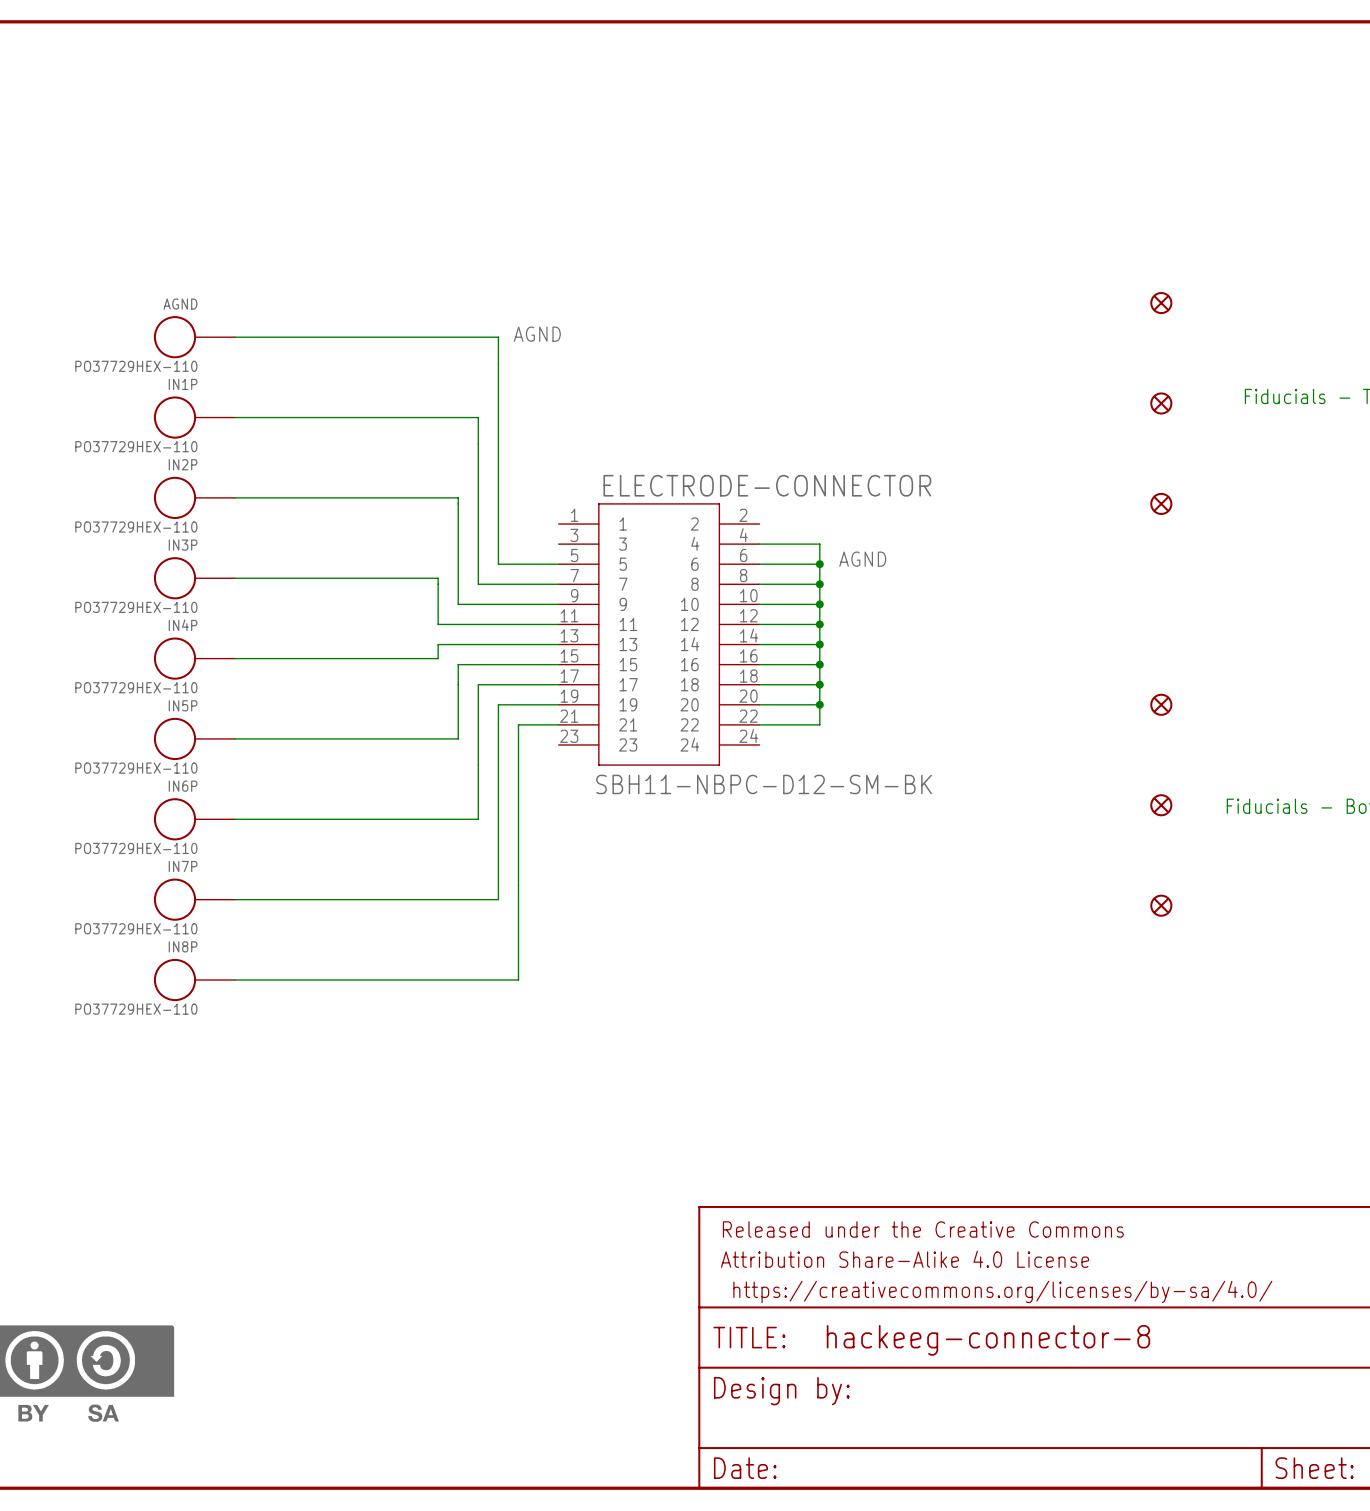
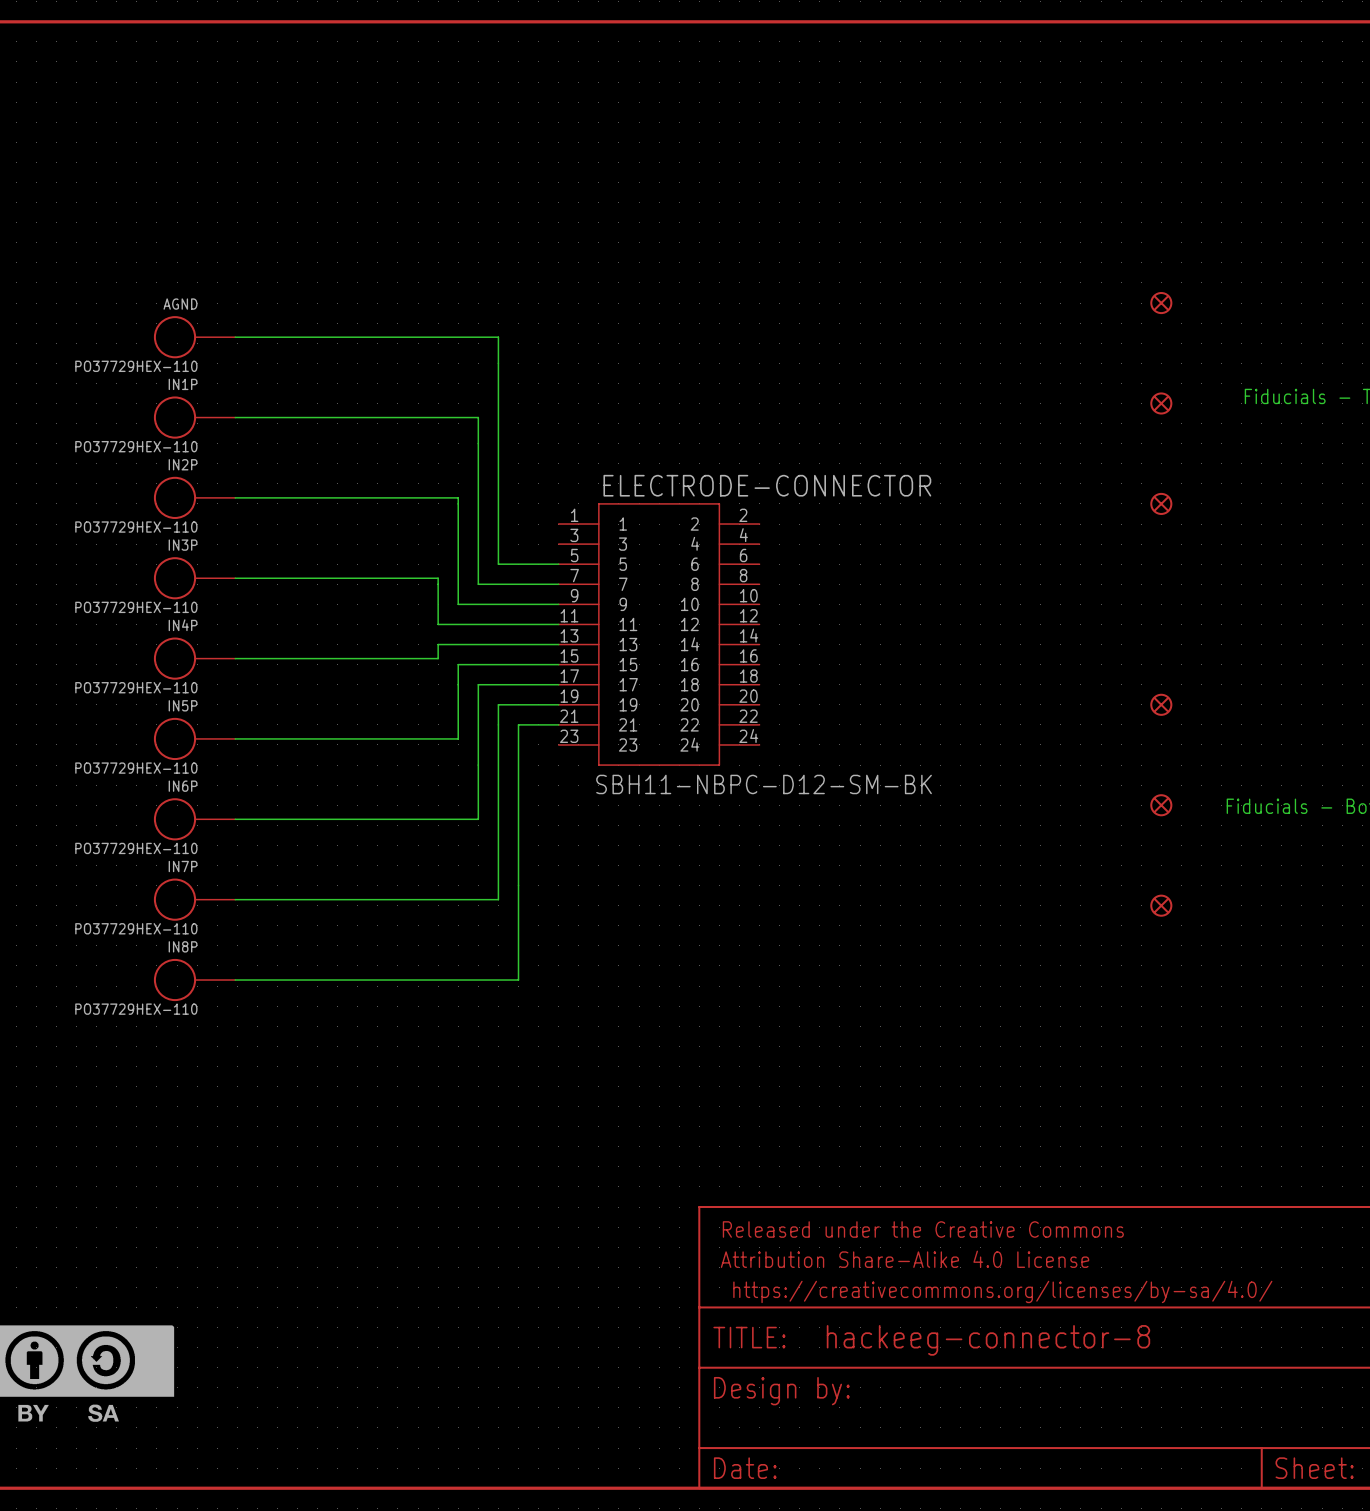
label: AGND (537, 334) -> none
wire: (759, 544) (819, 544) (819, 724) (759, 724) -> none
label: AGND (862, 559) -> none
wire: (759, 564) (819, 564) -> none
junction: (819, 564) -> none
wire: (759, 584) (819, 584) -> none
junction: (819, 584) -> none
wire: (759, 604) (819, 604) -> none
junction: (819, 604) -> none
wire: (759, 624) (819, 624) -> none
junction: (819, 624) -> none
wire: (759, 644) (819, 644) -> none
junction: (819, 644) -> none
wire: (759, 664) (819, 664) -> none
junction: (819, 664) -> none
wire: (759, 684) (819, 684) -> none
junction: (819, 684) -> none
wire: (759, 704) (819, 704) -> none
junction: (819, 704) -> none

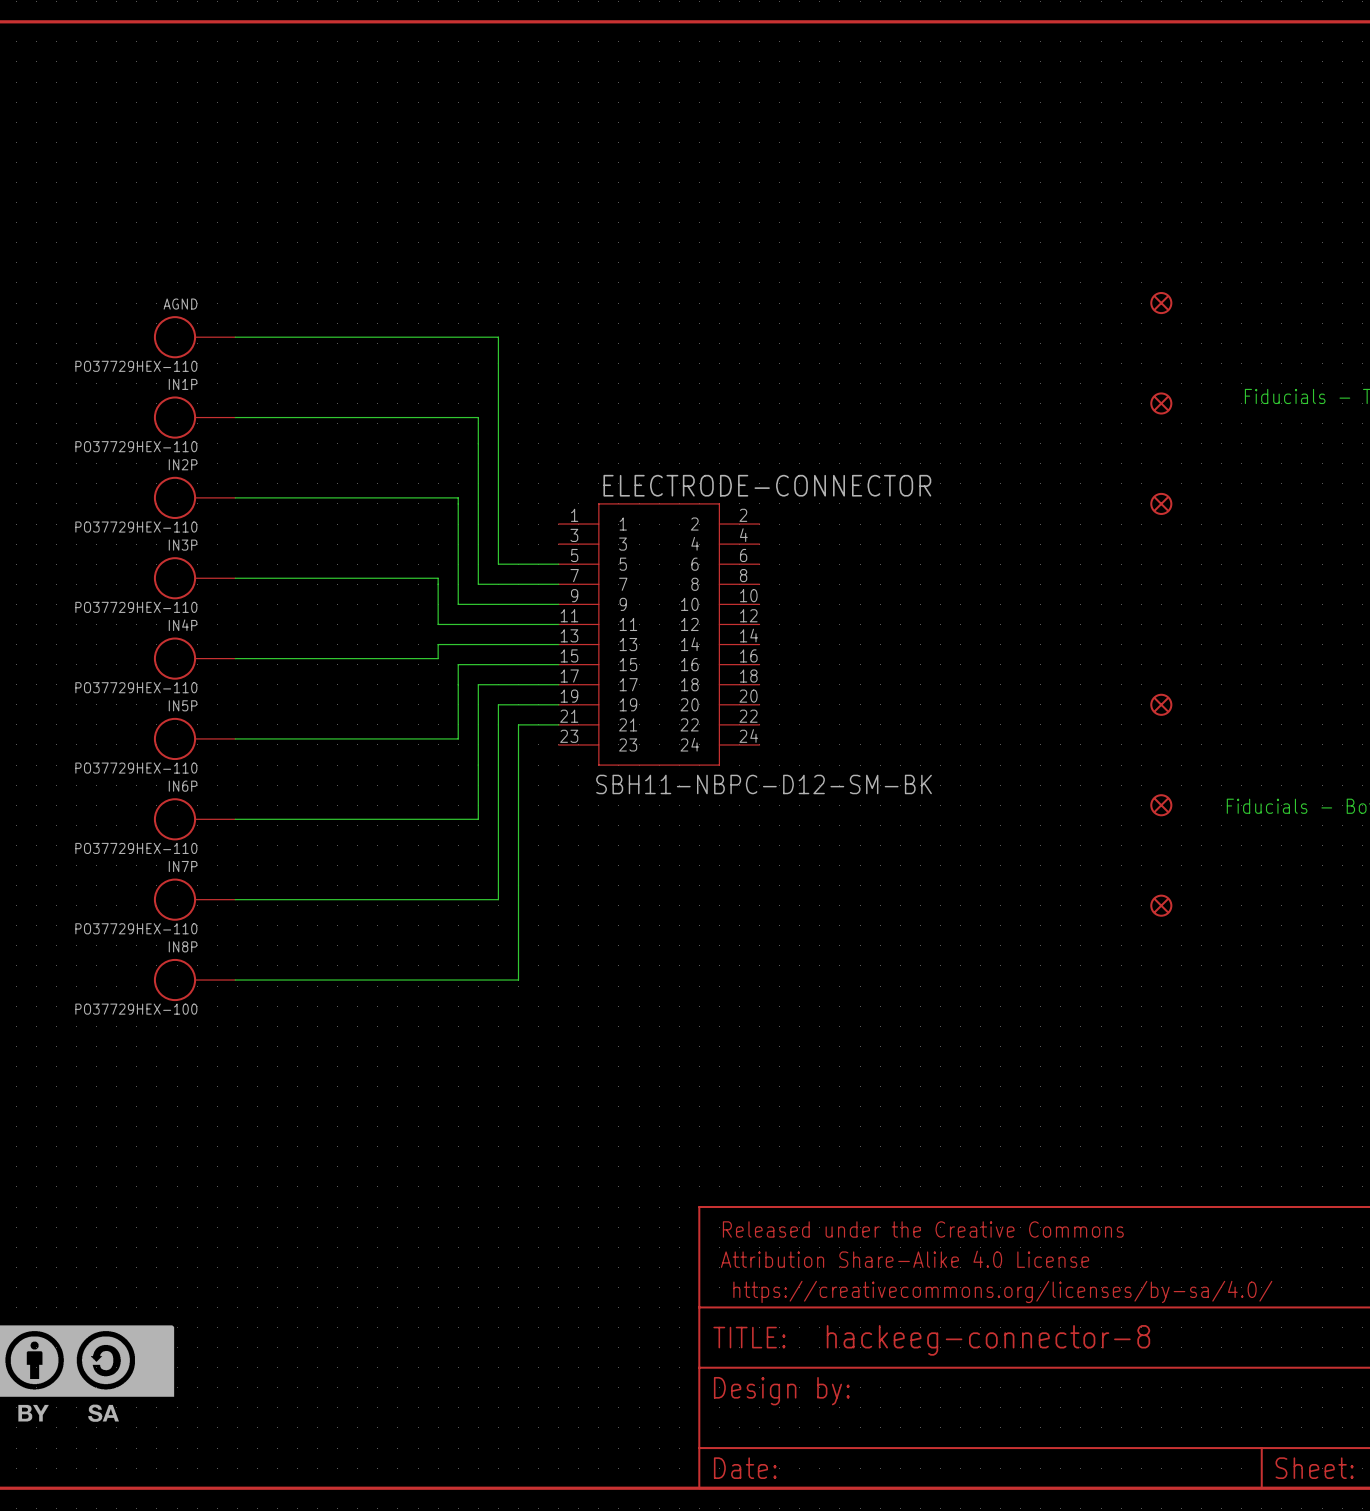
IN8P value: PO37729HEX-110 (136, 1009) -> PO37729HEX-100 (136, 1009)

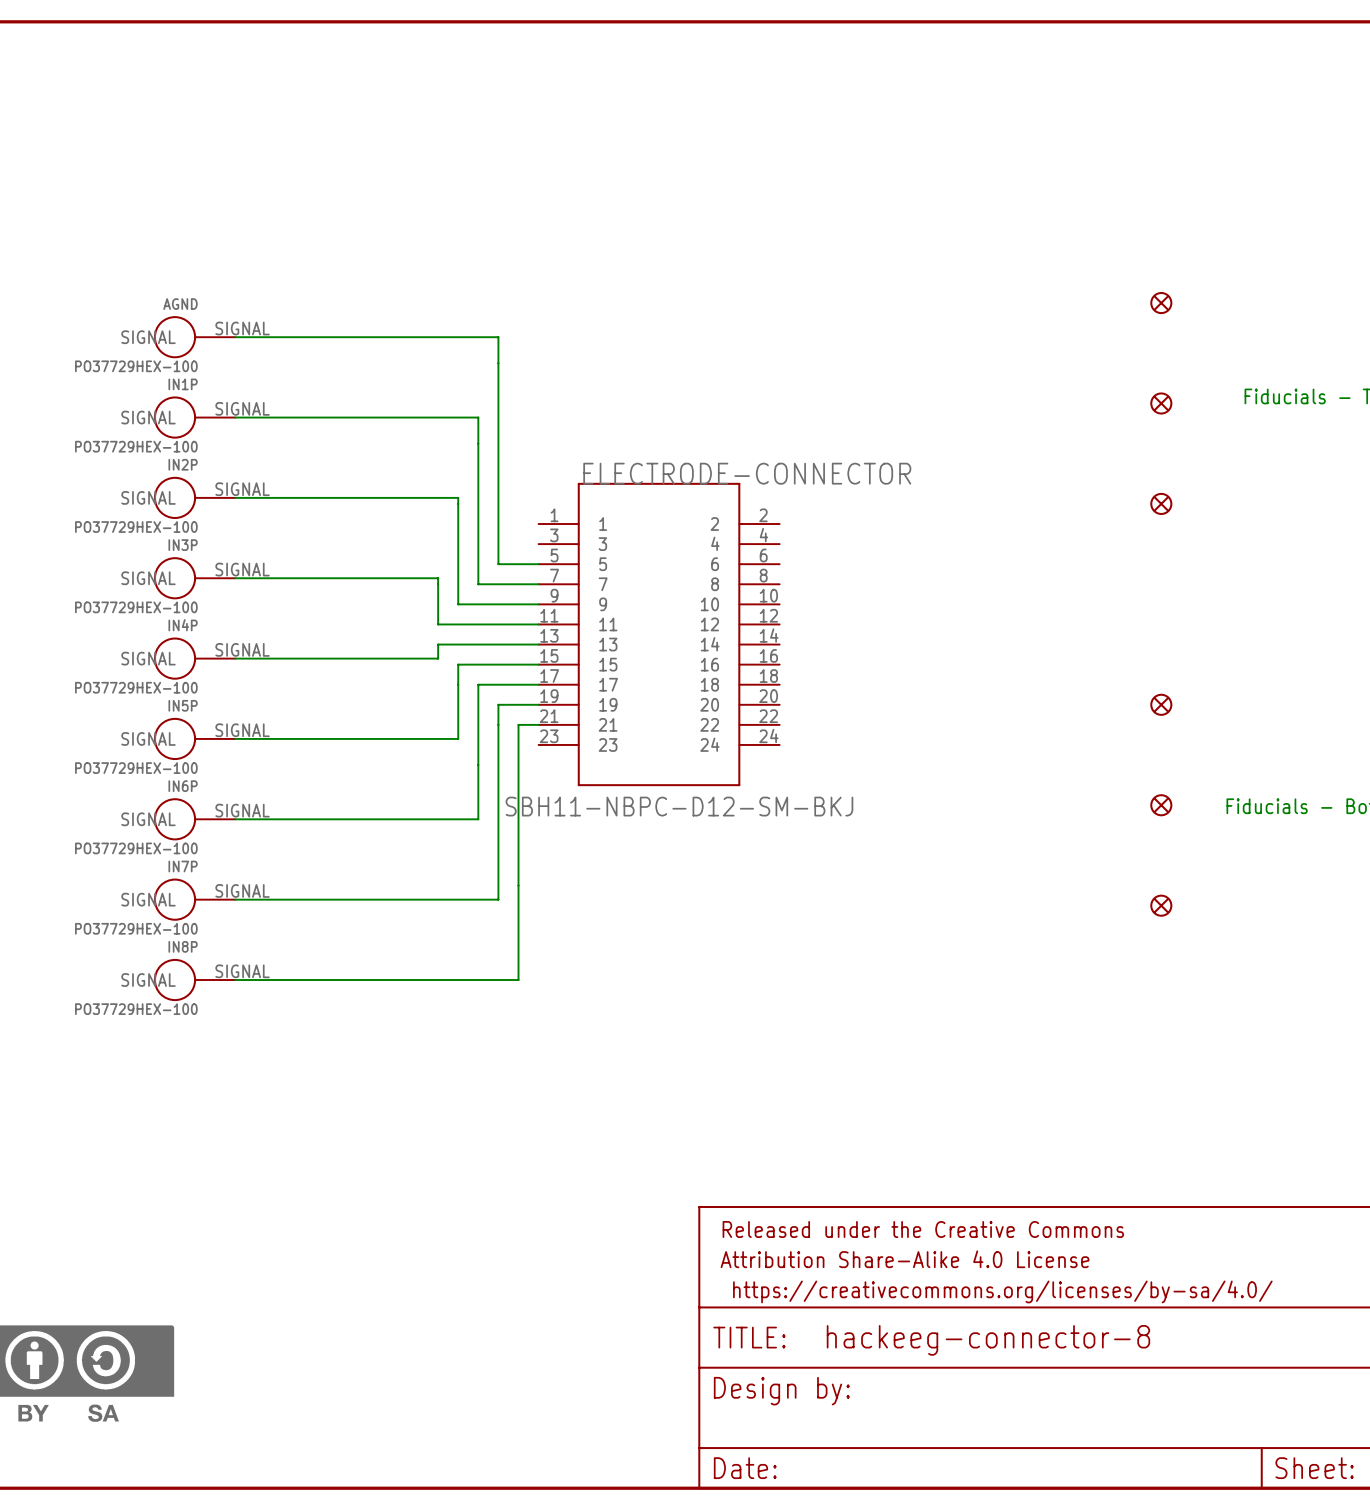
AGND pin number: none -> SIGNAL (242, 328)
AGND pin name: none -> SIGNAL (148, 337)
AGND value: PO37729HEX-110 (136, 366) -> PO37729HEX-100 (136, 366)
IN1P pin number: none -> SIGNAL (242, 408)
IN1P pin name: none -> SIGNAL (148, 417)
IN1P value: PO37729HEX-110 (136, 446) -> PO37729HEX-100 (136, 446)
ELECTRODE-CONNECTOR name position: ELECTRODE-CONNECTOR (767, 485) -> ELECTRODE-CONNECTOR (747, 473)
IN2P pin number: none -> SIGNAL (242, 489)
IN2P pin name: none -> SIGNAL (148, 497)
ELECTRODE-CONNECTOR symbol: [558, 503, 760, 766] -> [538, 482, 780, 787]
IN2P value: PO37729HEX-110 (136, 527) -> PO37729HEX-100 (136, 527)
IN3P pin number: none -> SIGNAL (242, 569)
IN3P pin name: none -> SIGNAL (148, 578)
IN3P value: PO37729HEX-110 (136, 607) -> PO37729HEX-100 (136, 607)
IN4P pin number: none -> SIGNAL (242, 649)
IN4P pin name: none -> SIGNAL (148, 658)
IN4P value: PO37729HEX-110 (136, 687) -> PO37729HEX-100 (136, 687)
IN5P pin number: none -> SIGNAL (242, 730)
IN5P pin name: none -> SIGNAL (148, 738)
IN5P value: PO37729HEX-110 (136, 768) -> PO37729HEX-100 (136, 768)
ELECTRODE-CONNECTOR value: SBH11-NBPC-D12-SM-BK (764, 784) -> SBH11-NBPC-D12-SM-BKJ (679, 806)
IN6P pin number: none -> SIGNAL (242, 810)
IN6P pin name: none -> SIGNAL (148, 819)
IN6P value: PO37729HEX-110 (136, 848) -> PO37729HEX-100 (136, 848)
IN7P pin number: none -> SIGNAL (242, 890)
IN7P pin name: none -> SIGNAL (148, 899)
IN7P value: PO37729HEX-110 (136, 928) -> PO37729HEX-100 (136, 928)
IN8P pin number: none -> SIGNAL (242, 971)
IN8P pin name: none -> SIGNAL (148, 980)

